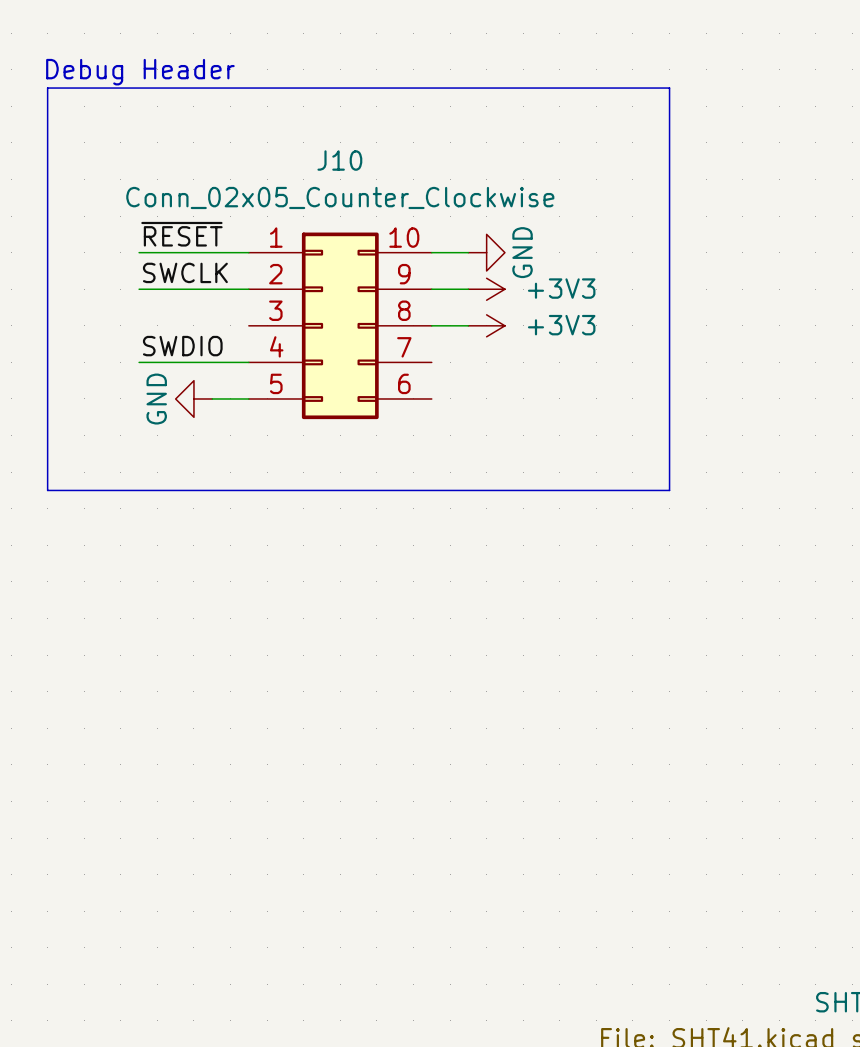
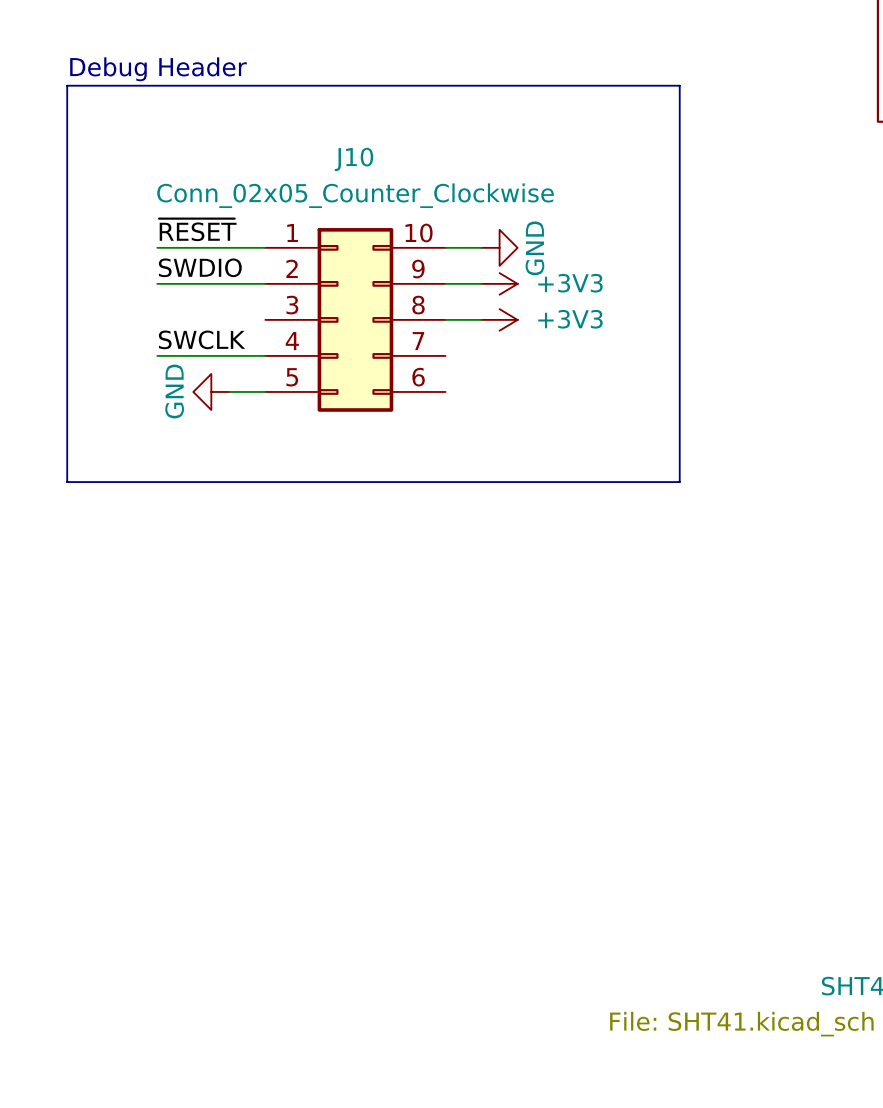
label: SWCLK (185, 272) -> SWDIO (200, 267)
label: SWDIO (182, 346) -> SWCLK (202, 339)

